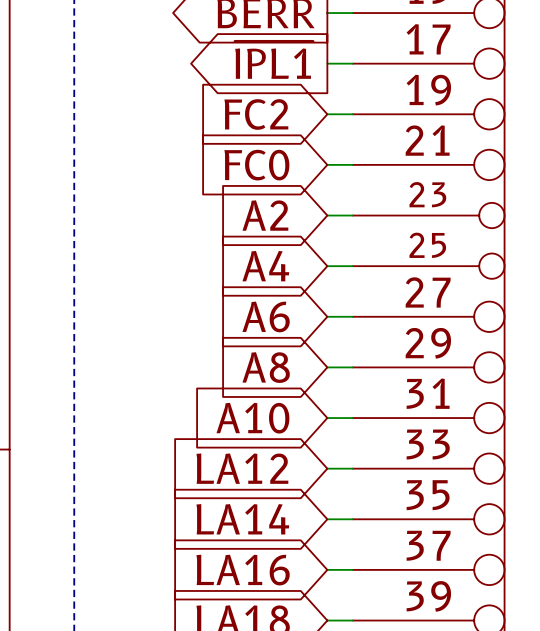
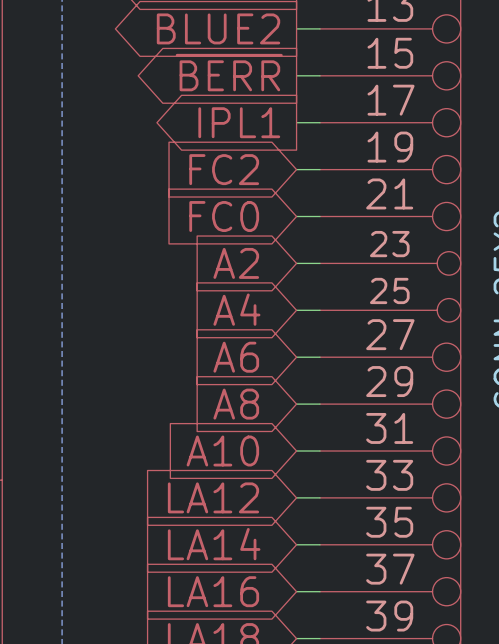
global label: ~{IPL1} (274, 60) -> IPL1 (239, 122)

